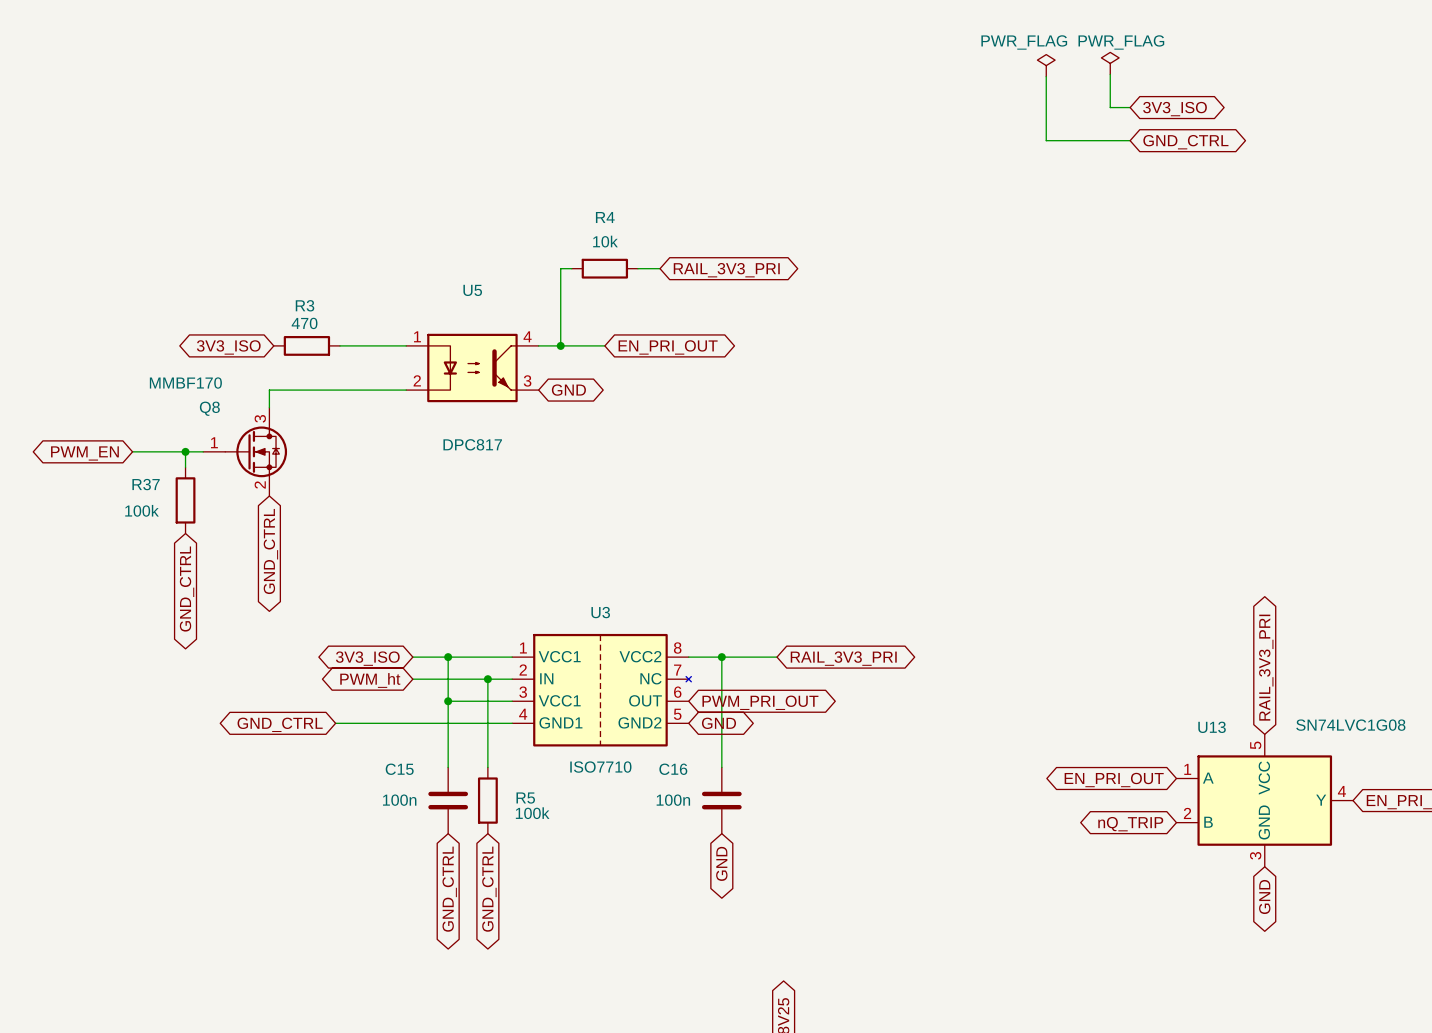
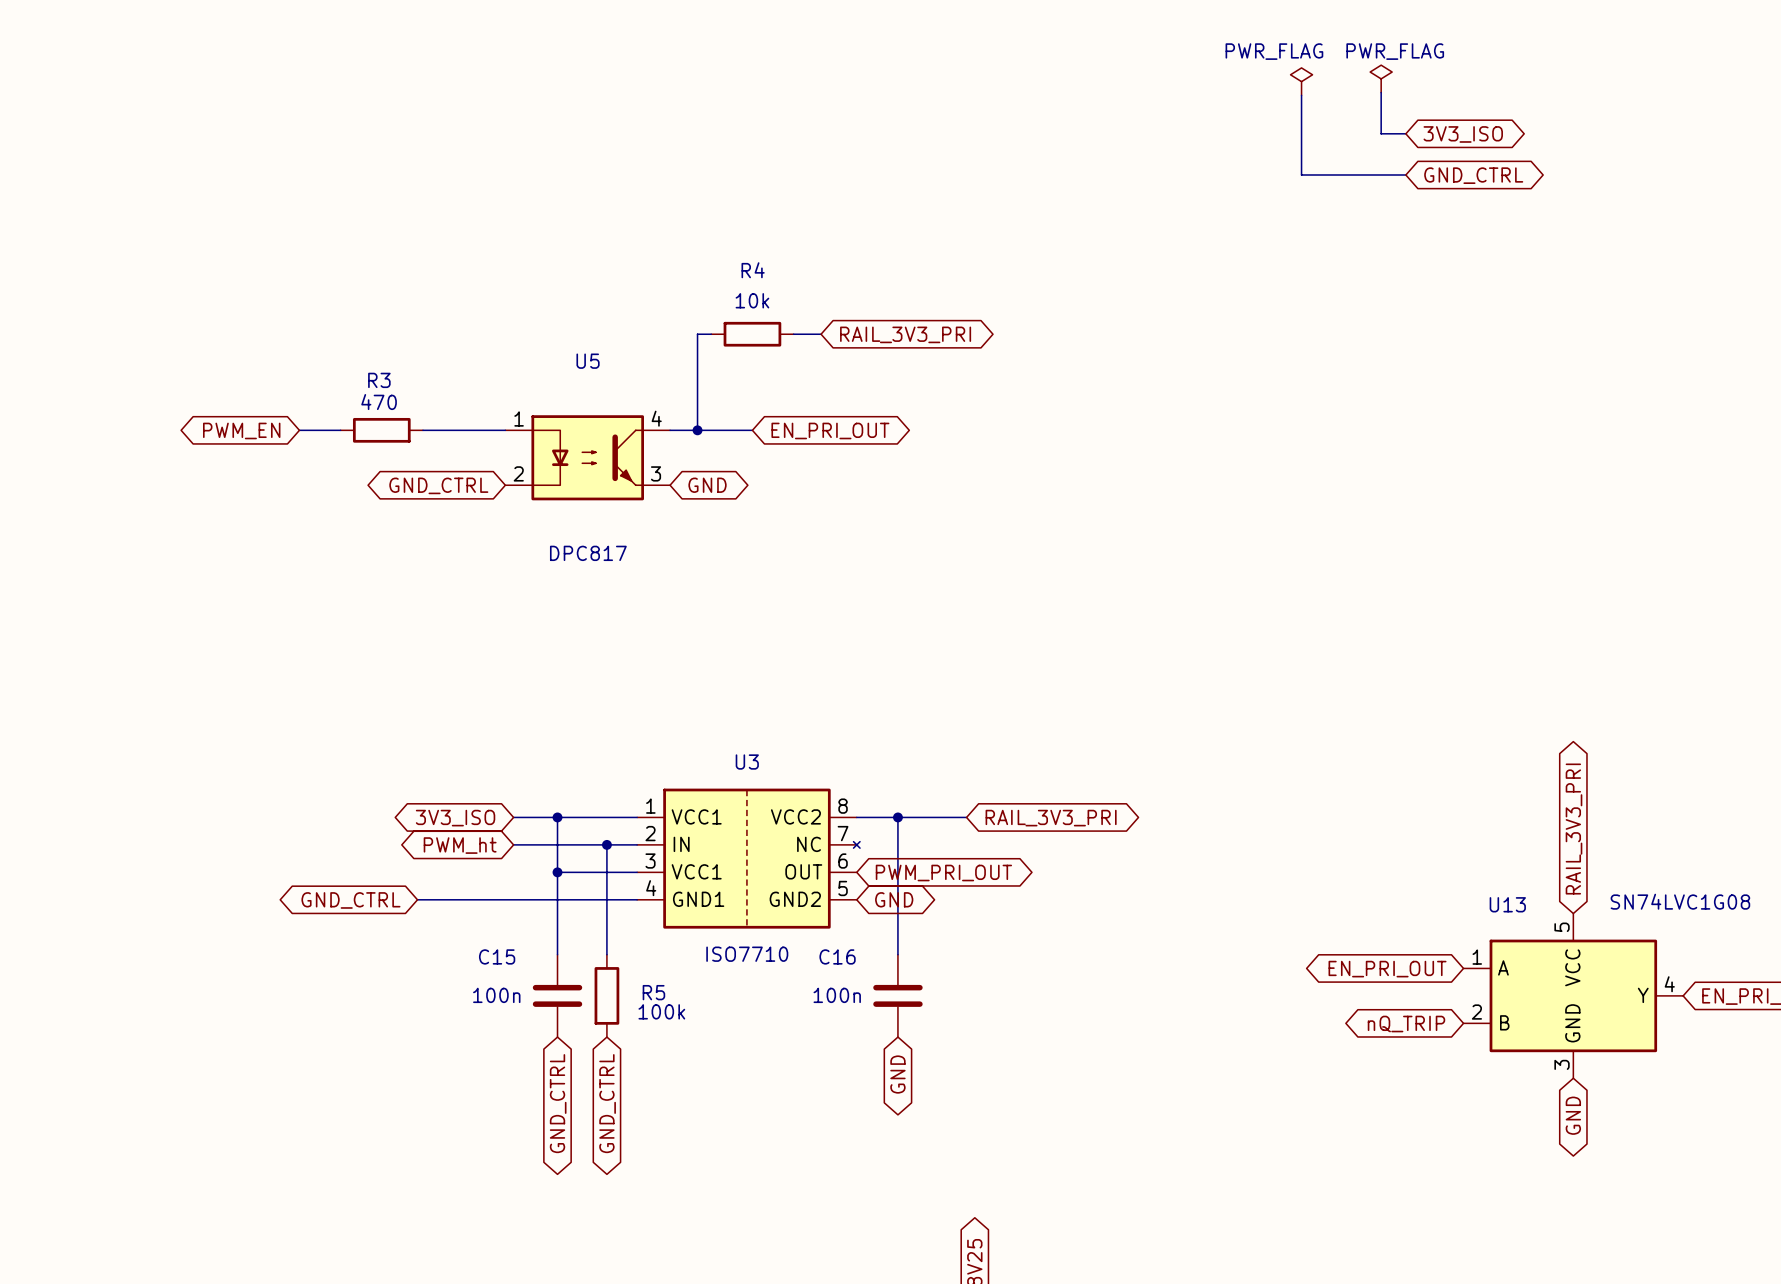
wire: none -> (299, 430) (340, 430)
global label: 3V3_ISO (228, 347) -> none
wire: (406, 390) (269, 390) (269, 407) -> none
global label: none -> GND_CTRL (438, 485)
wire: (132, 451) (203, 451) -> none
wire: (185, 451) (185, 467) -> none
junction: (185, 451) -> none
Q8: MMBF170 (245, 451) -> none
global label position: PWM_EN (84, 453) -> PWM_EN (241, 430)
R37: 100k (185, 500) -> none
global label: GND_CTRL (270, 551) -> none
global label: GND_CTRL (187, 589) -> none

